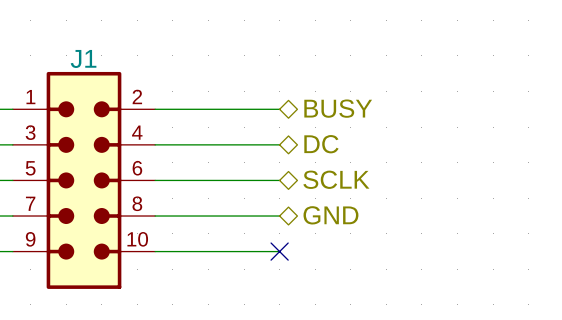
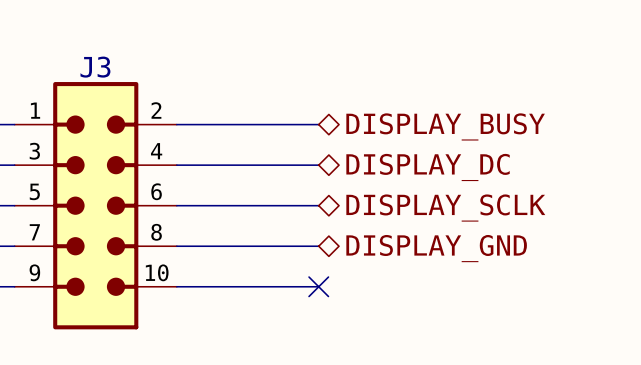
J1 name: J1 (83, 58) -> J3 (95, 67)
hierarchical label: BUSY (338, 108) -> DISPLAY_BUSY (445, 126)
hierarchical label: DC (321, 144) -> DISPLAY_DC (428, 167)
hierarchical label: SCLK (336, 179) -> DISPLAY_SCLK (445, 208)
hierarchical label: GND (330, 215) -> DISPLAY_GND (436, 248)

